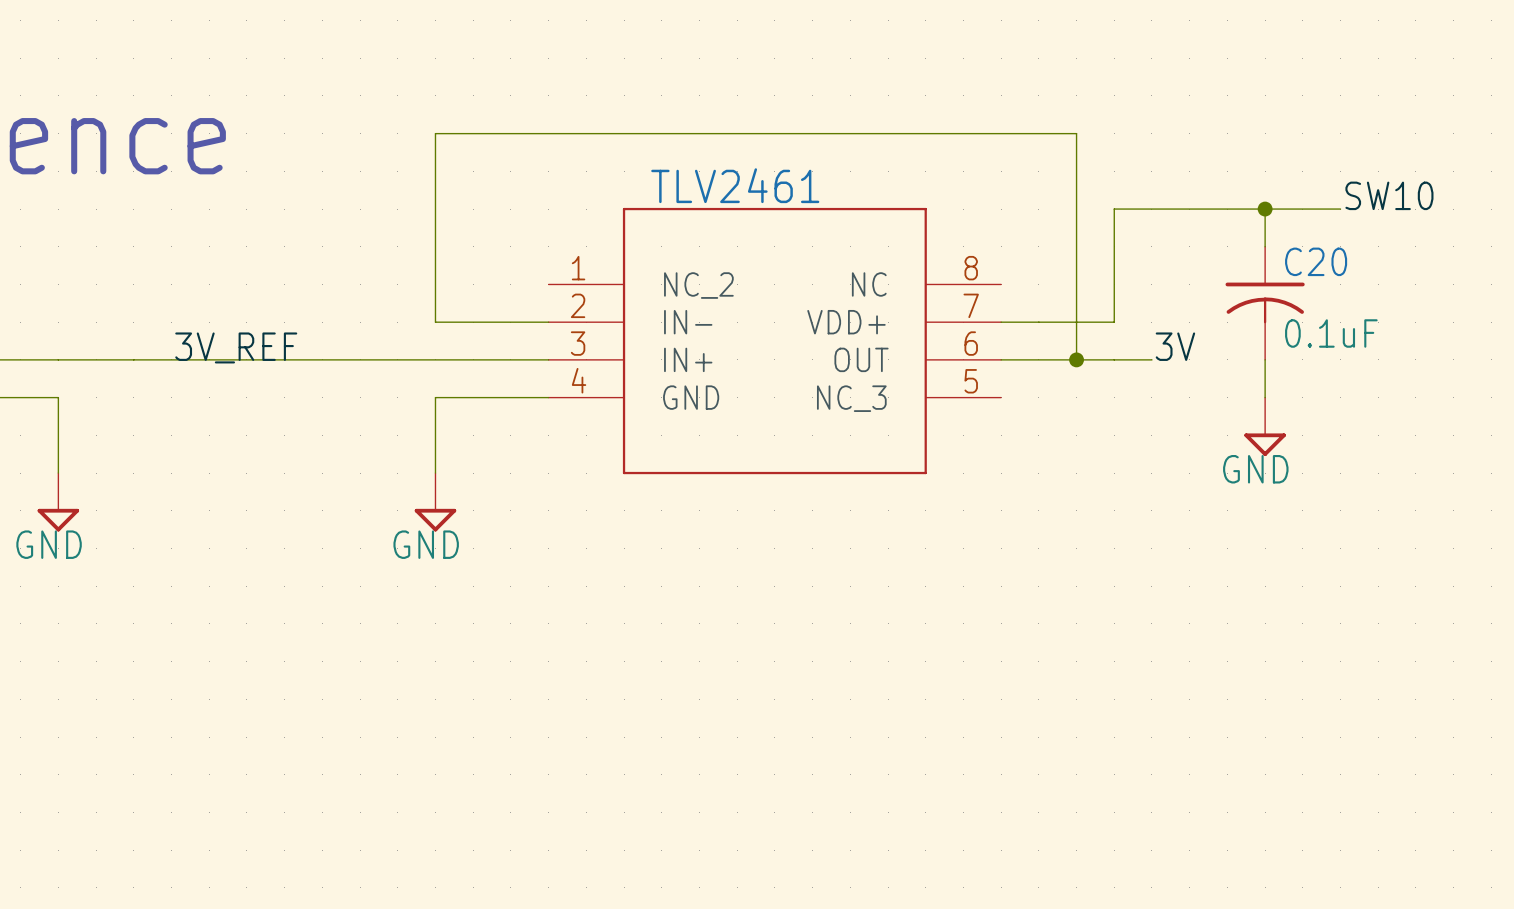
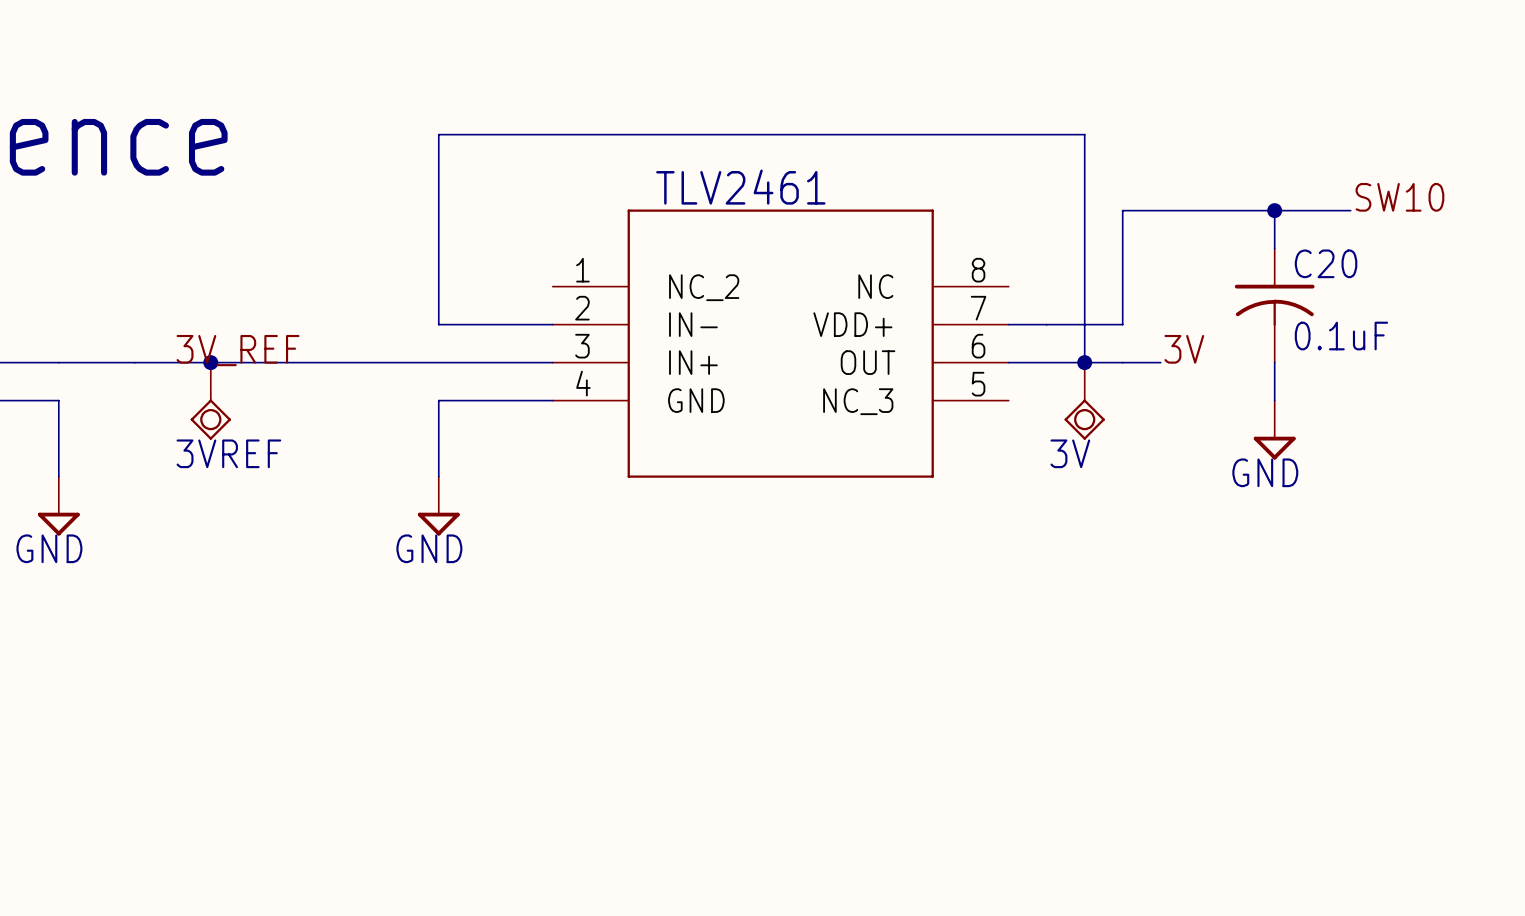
junction: none -> (210, 362)
3VREF: none -> (210, 401)
3V: none -> (1084, 401)

